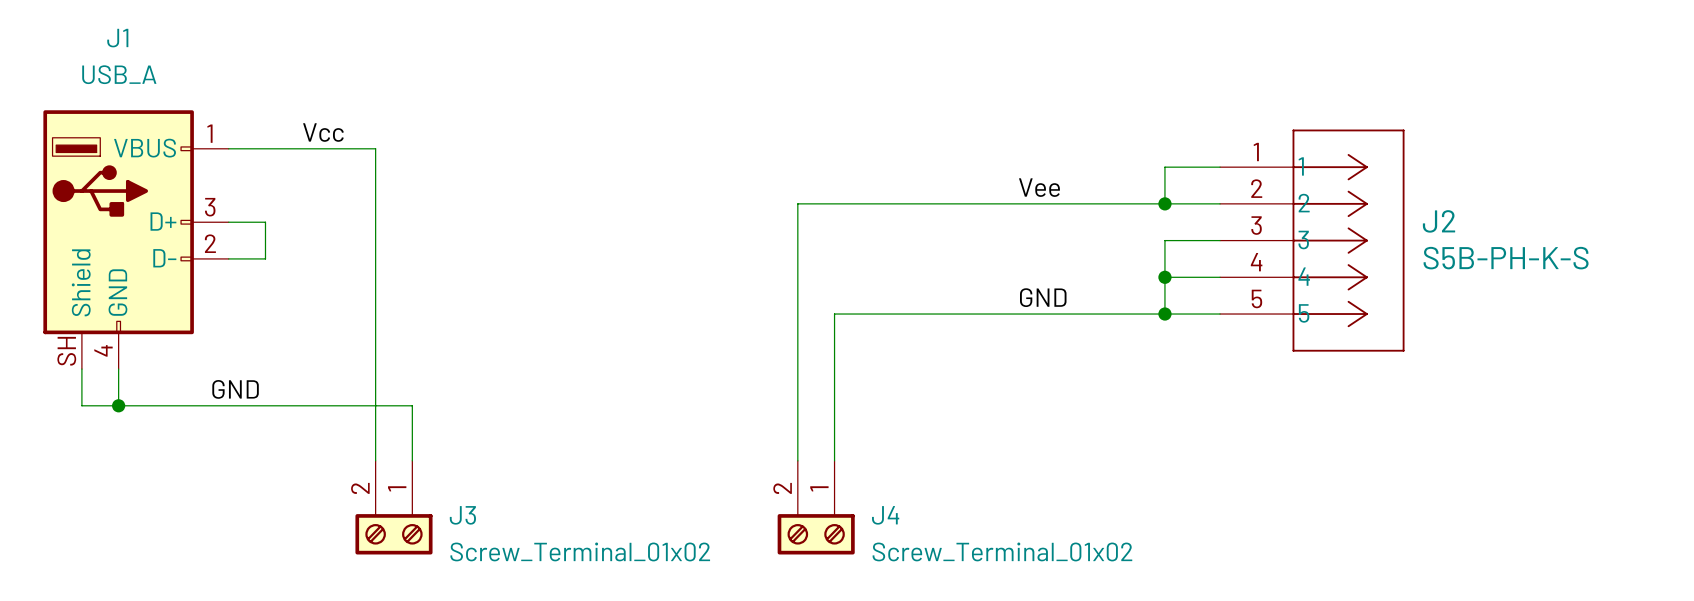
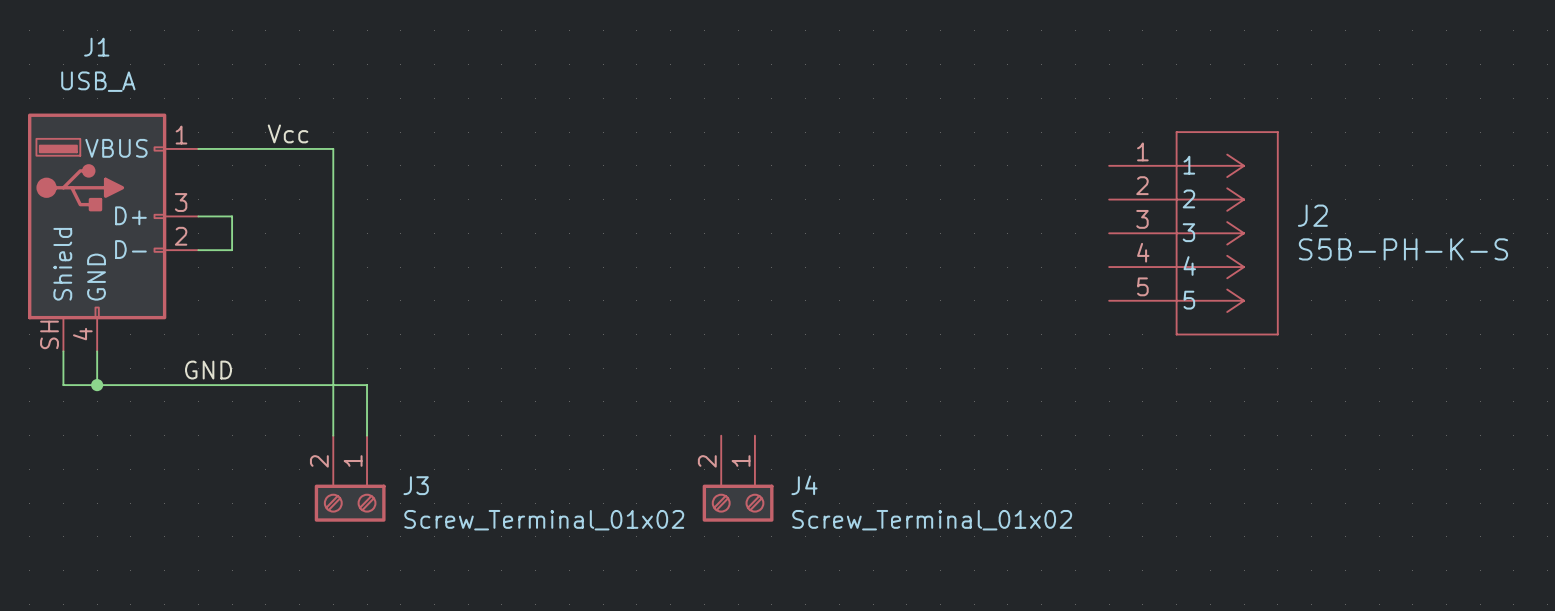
wire: (1220, 167) (1164, 167) (1164, 203) -> none
label: Vee (1039, 187) -> none
junction: (1164, 203) -> none
wire: (1220, 203) (797, 203) (797, 460) -> none
wire: (1220, 240) (1164, 240) (1164, 314) -> none
wire: (1164, 277) (1220, 277) -> none
junction: (1164, 277) -> none
label: GND (1043, 297) -> none
junction: (1164, 314) -> none
wire: (1220, 314) (834, 314) (834, 460) -> none

